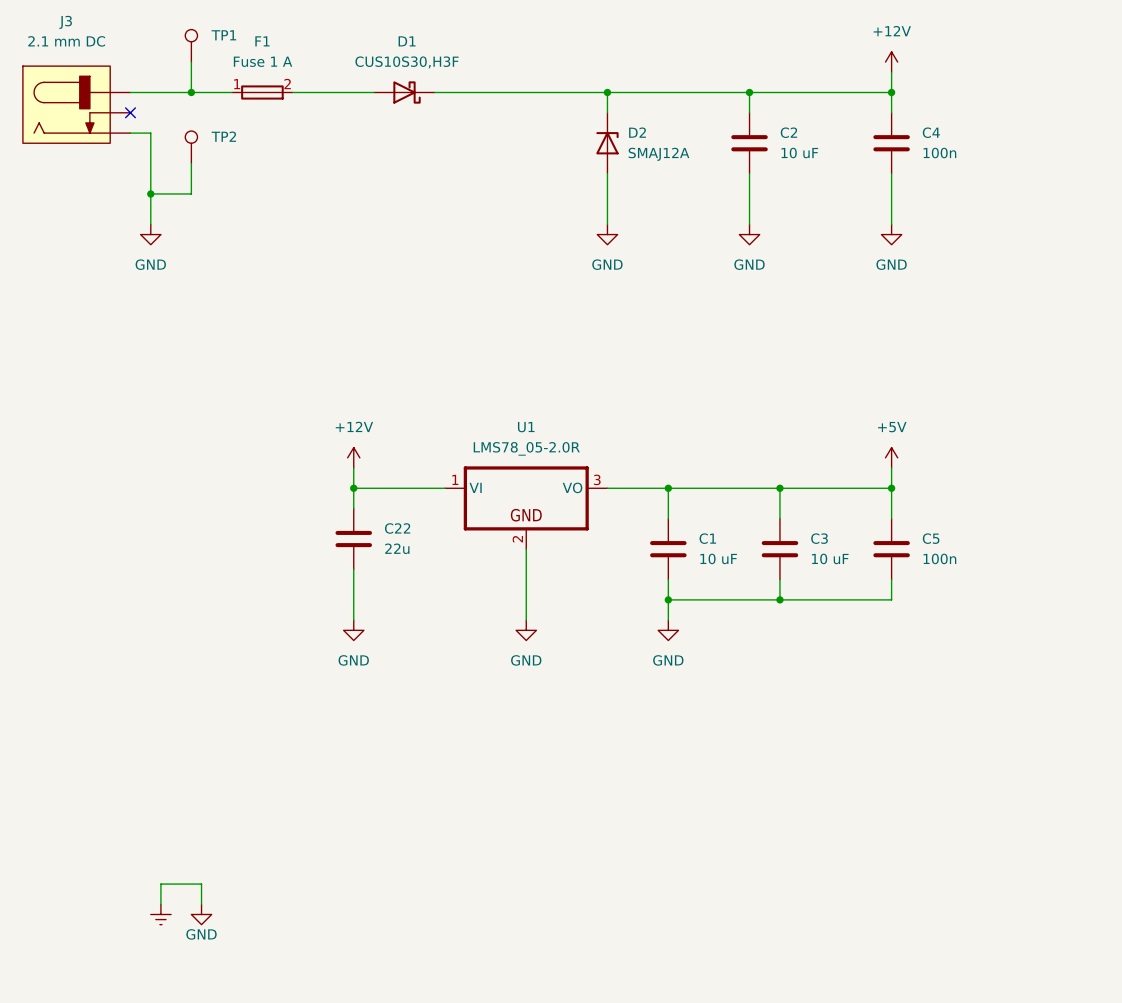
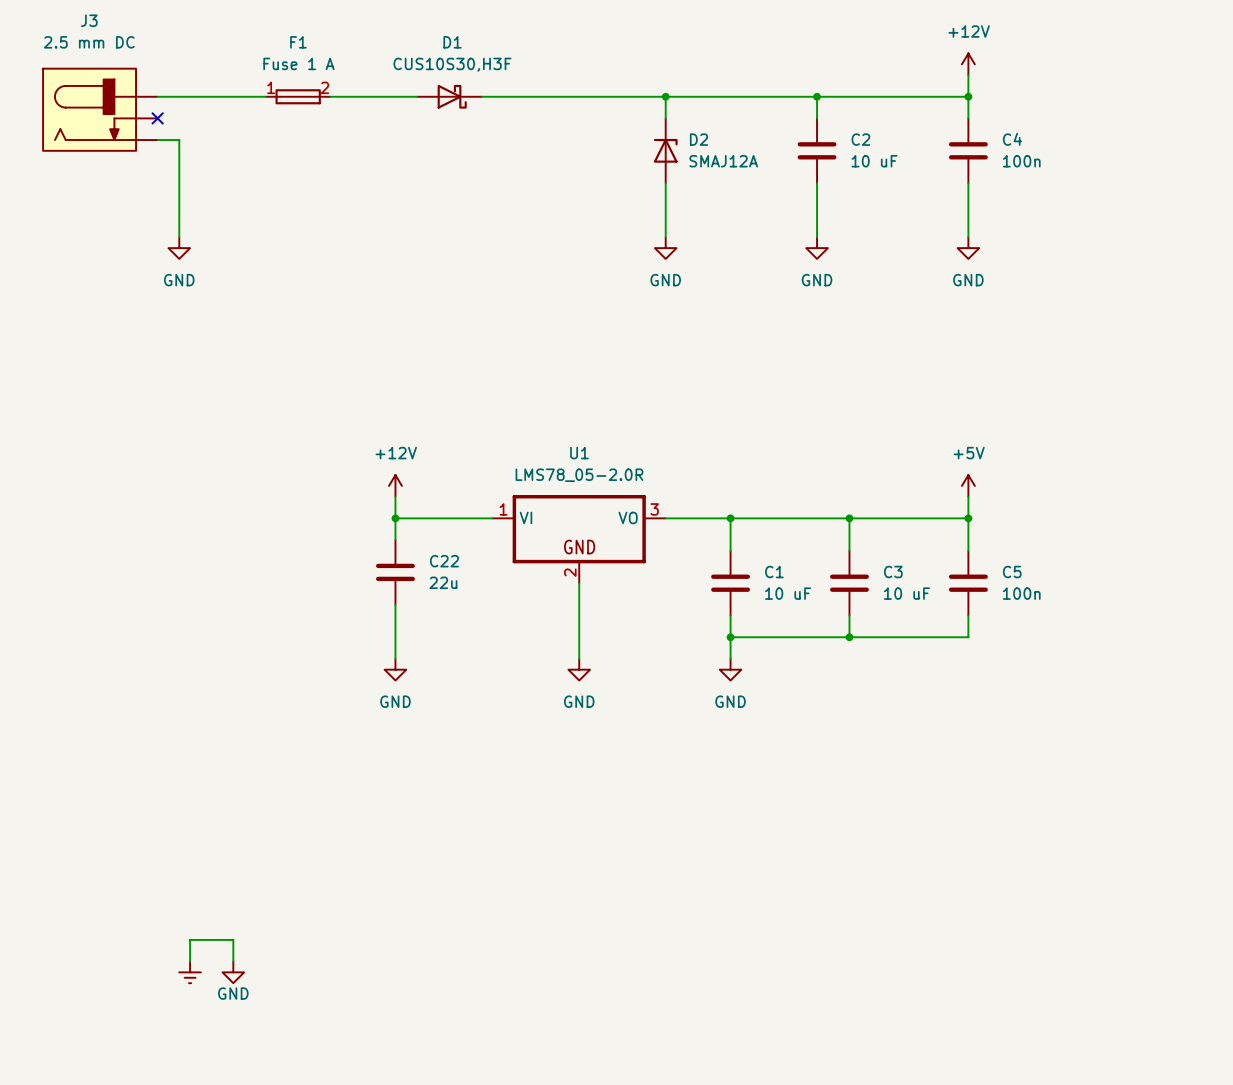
J3 text: 2.1 mm DC (66, 41) -> 2.5 mm DC (89, 42)
TP1: (191, 45) -> none
wire: (191, 62) (191, 92) -> none
junction: (191, 92) -> none
TP2: (191, 147) -> none
wire: (191, 163) (191, 193) (150, 193) -> none
junction: (150, 193) -> none

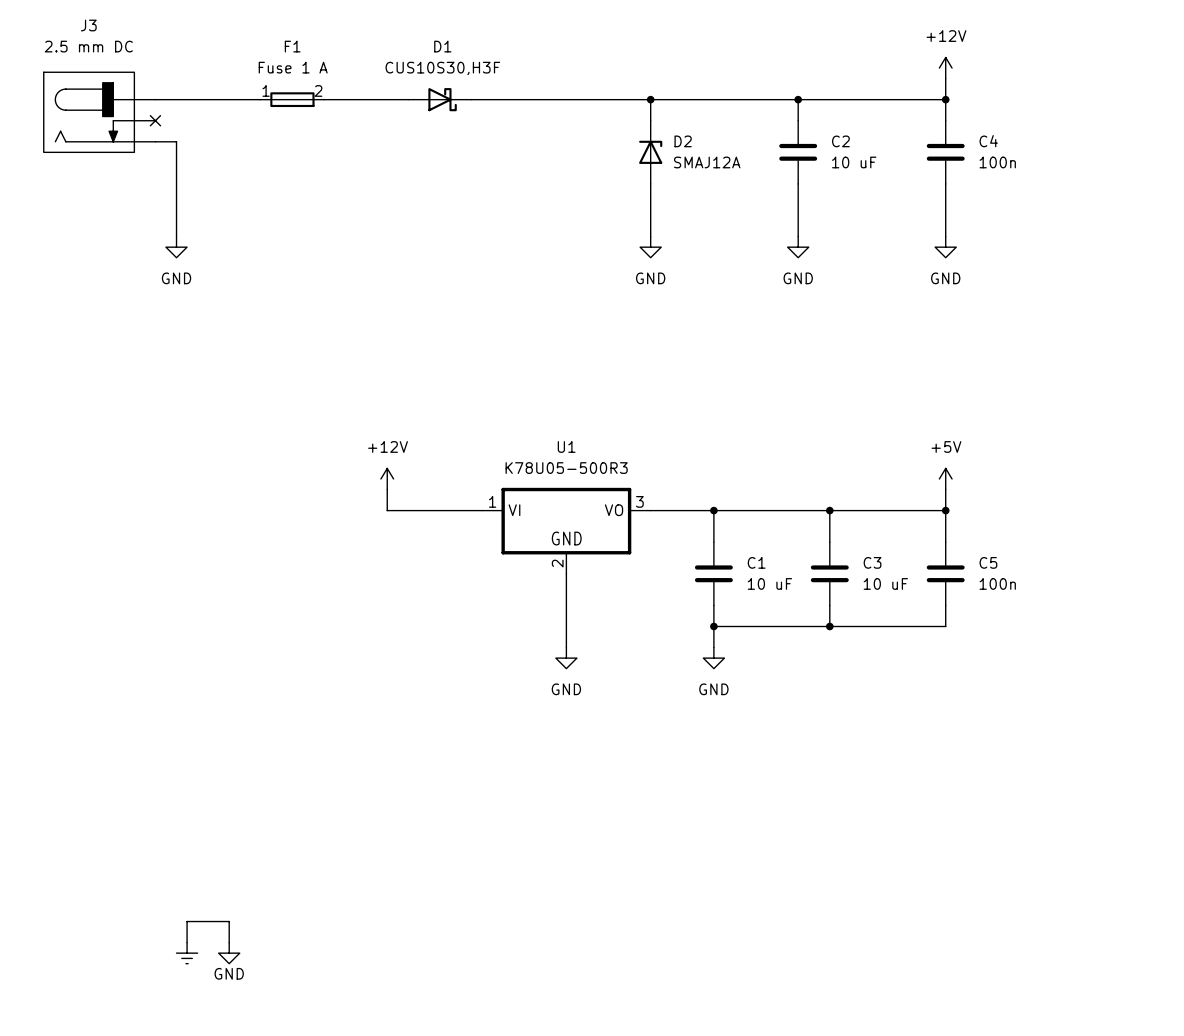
U1 text: LMS78_05-2.0R (579, 475) -> K78U05-500R3 (566, 468)
wire: (395, 518) (395, 539) -> none
junction: (395, 518) -> none
C22: (395, 572) -> none
wire: (395, 604) (395, 658) -> none
power symbol: GND (395, 669) -> none

